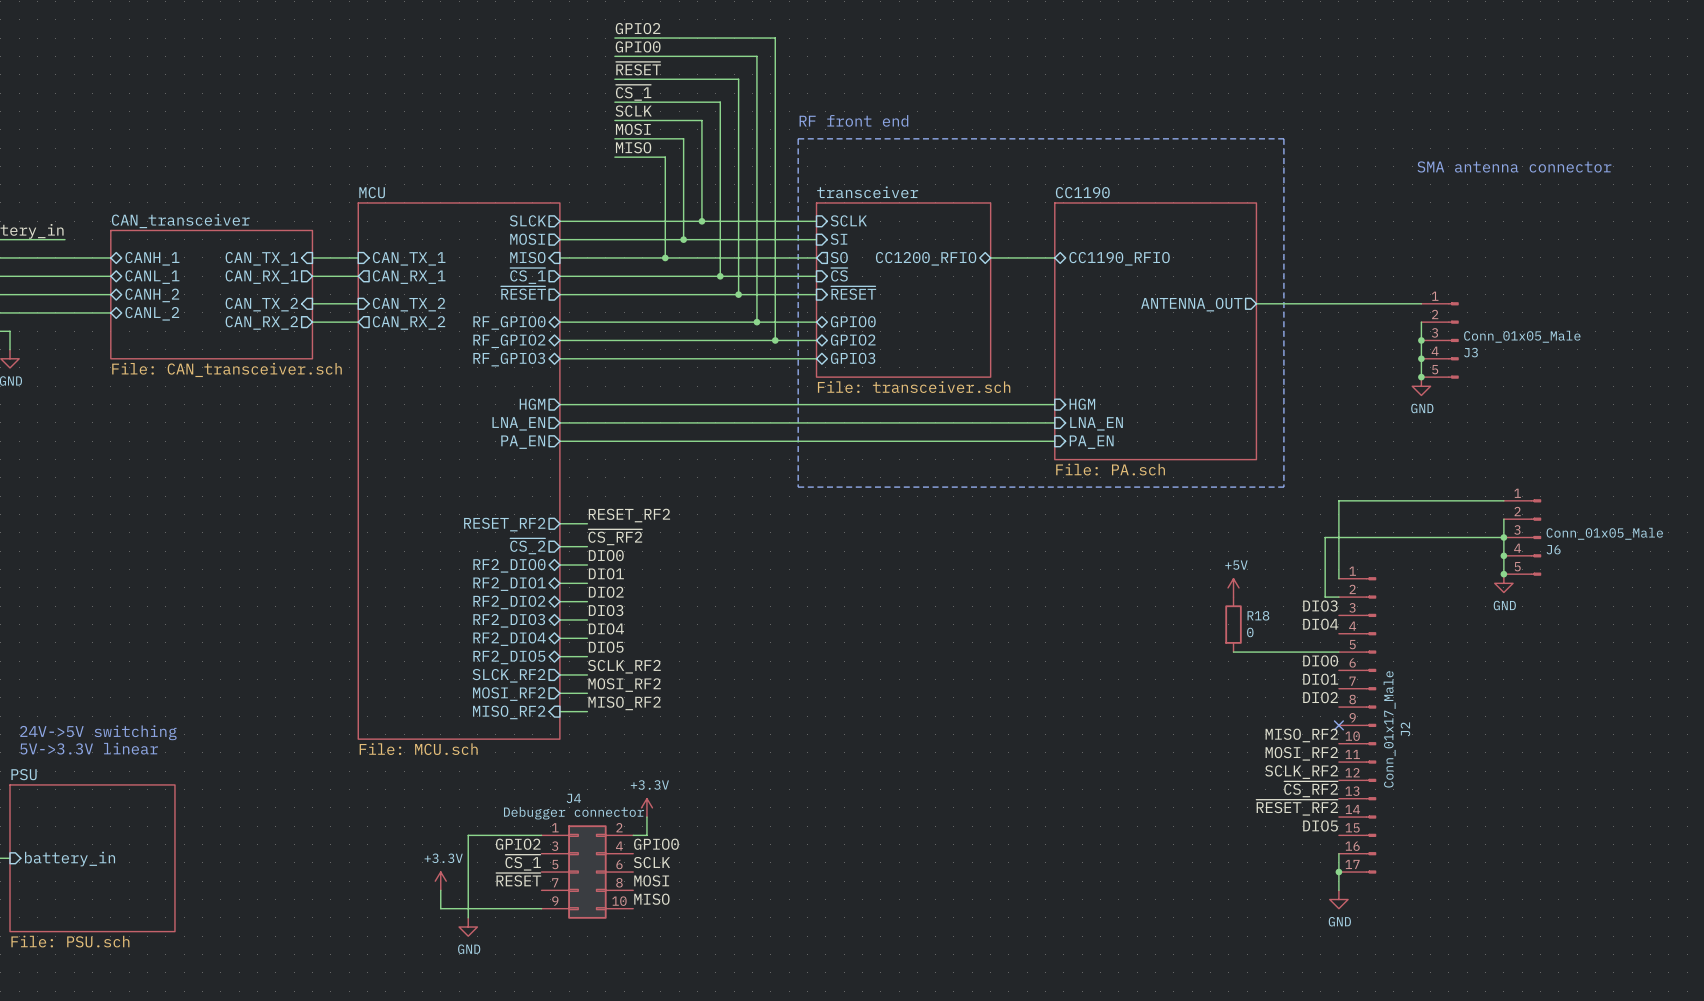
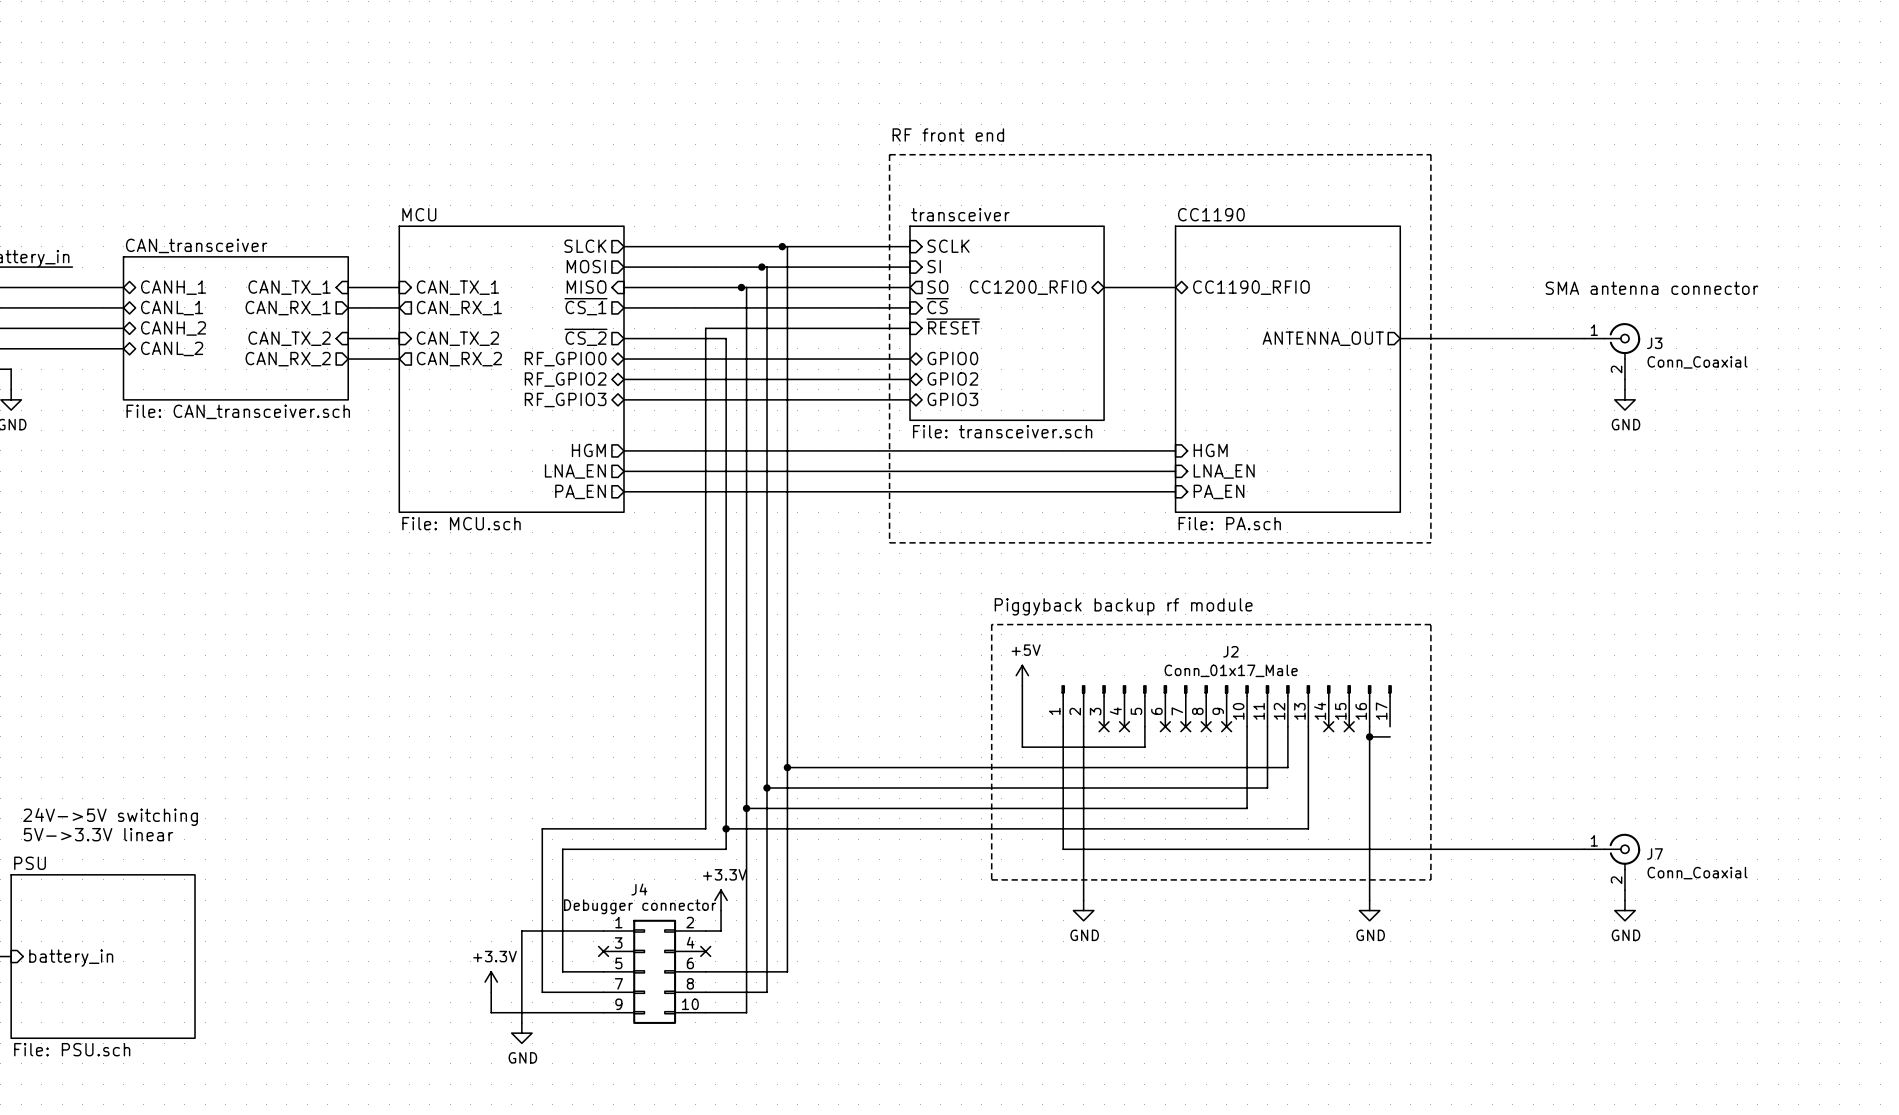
label: GPIO2 (638, 28) -> none
wire: (614, 38) (775, 38) (775, 340) -> none
label: GPIO0 (638, 46) -> none
wire: (614, 56) (756, 56) (756, 322) -> none
label: ~{RESET} (638, 68) -> none
wire: (614, 79) (738, 79) (738, 294) -> none
label: ~{CS_1} (633, 92) -> none
wire: (614, 102) (720, 102) (720, 276) -> none
label: SCLK (633, 111) -> none
wire: (614, 120) (701, 120) (701, 221) -> none
label: MOSI (633, 129) -> none
wire: (614, 138) (683, 138) (683, 239) -> none
label: MISO (633, 147) -> none
wire: (614, 157) (665, 157) (665, 257) -> none
text position: SMA antenna connector (1514, 166) -> SMA antenna connector (1651, 288)
wire: none -> (787, 246) (787, 971) (705, 971)
wire: none -> (766, 267) (766, 992) (705, 992)
wire: none -> (746, 287) (746, 1012) (705, 1012)
junction: (720, 276) -> none
sheet pin: ~{RESET} (523, 293) -> none
wire: (559, 294) (633, 294) -> (603, 992) (542, 992) (542, 828) (705, 828) (705, 328)
junction: (738, 294) -> none
J3 symbol: [1421, 302, 1459, 379] -> [1584, 323, 1641, 380]
sheet pin: none -> ~{CS_2} (586, 337)
wire: none -> (624, 338) (726, 338) (726, 849) (562, 849) (562, 971) (603, 971)
junction: (756, 322) -> none
wire: (1421, 322) (1421, 377) -> none
sheet MCU: none -> File: MCU.sch (511, 369)
J3 value: Conn_01x05_Male (1522, 336) -> Conn_Coaxial (1697, 362)
junction: (775, 340) -> none
junction: (1421, 340) -> none
wire: none -> (1624, 379) (1624, 389)
J3 name position: J3 (1471, 352) -> J3 (1654, 343)
junction: (1421, 358) -> none
junction: (1421, 377) -> none
power symbol position: GND (1421, 386) -> GND (1624, 399)
sheet MCU: File: MCU.sch (459, 471) -> none
wire: (1503, 500) (1338, 500) (1338, 578) -> none
label: RESET_RF2 (629, 515) -> none
wire: (1503, 519) (1503, 574) -> none
wire: (559, 523) (587, 523) -> none
sheet pin: RESET_RF2 (504, 524) -> none
label: ~{CS_RF2} (615, 537) -> none
wire: (1503, 537) (1325, 537) (1325, 597) (1338, 597) -> none
junction: (1503, 537) -> none
J6: Conn_01x05_Male (1522, 537) -> none
text: none -> Piggyback backup rf module (1123, 606)
sheet pin: ~{CS_2} (527, 546) -> none
wire: (559, 546) (587, 546) -> none
label: DIO0 (606, 555) -> none
junction: (1503, 555) -> none
line: none -> (991, 624) (1430, 624) (1430, 879) (991, 879) (991, 624)
sheet pin: RF2_DIO0 (509, 565) -> none
wire: (559, 565) (587, 565) -> none
label: DIO1 (606, 573) -> none
junction: (1503, 574) -> none
wire: (559, 583) (587, 583) -> none
power symbol: GND (1503, 583) -> none
sheet pin: RF2_DIO1 (509, 584) -> none
power symbol: +5V (1233, 587) -> none
label: DIO2 (606, 592) -> none
wire: (559, 601) (587, 601) -> none
sheet pin: RF2_DIO2 (509, 602) -> none
label: DIO3 (1320, 605) -> none
power symbol: none -> +5V (1022, 675)
label: DIO3 (606, 610) -> none
wire: none -> (1022, 685) (1022, 747) (1144, 747) (1144, 726)
wire: (559, 619) (587, 619) -> none
sheet pin: RF2_DIO3 (509, 620) -> none
R18: 0 (1233, 624) -> none
label: DIO4 (1320, 624) -> none
label: DIO4 (606, 628) -> none
wire: (559, 638) (587, 638) -> none
sheet pin: RF2_DIO4 (509, 639) -> none
label: DIO5 (606, 647) -> none
wire: none -> (1063, 726) (1063, 849) (1584, 849)
wire: none -> (1083, 726) (1083, 900)
no-connect mark: none -> (1104, 726)
no-connect mark: none -> (1124, 726)
no-connect mark: none -> (1165, 726)
no-connect mark: none -> (1185, 726)
no-connect mark: none -> (1206, 726)
no-connect mark: none -> (1226, 726)
wire: none -> (1247, 726) (1247, 808) (746, 808)
wire: none -> (1267, 726) (1267, 788) (766, 788)
wire: none -> (1287, 726) (1287, 767) (787, 767)
wire: none -> (1308, 726) (1308, 828) (726, 828)
no-connect mark: none -> (1328, 726)
no-connect mark: none -> (1349, 726)
wire: none -> (1369, 726) (1369, 900)
wire: (1233, 652) (1338, 652) -> none
wire: (559, 656) (587, 656) -> none
sheet pin: RF2_DIO5 (509, 657) -> none
label: DIO0 (1320, 660) -> none
wire: none -> (1369, 736) (1390, 736)
junction: none -> (1369, 736)
label: SCLK_RF2 (624, 666) -> none
wire: (559, 674) (587, 674) -> none
sheet pin: SLCK_RF2 (509, 675) -> none
label: DIO1 (1320, 679) -> none
label: MOSI_RF2 (624, 685) -> none
junction: none -> (787, 767)
wire: (559, 693) (587, 693) -> none
sheet pin: MOSI_RF2 (509, 694) -> none
label: DIO2 (1320, 697) -> none
label: MISO_RF2 (624, 703) -> none
junction: none -> (766, 788)
wire: (559, 711) (587, 711) -> none
sheet pin: MISO_RF2 (509, 712) -> none
junction: none -> (746, 808)
no-connect mark: (1338, 725) -> none
J2 position: (1357, 725) -> (1226, 705)
J2 rotation: 0° (1370, 725) -> 90° counterclockwise (1226, 690)
label: MISO_RF2 (1301, 735) -> none
junction: none -> (726, 828)
label: MOSI_RF2 (1301, 753) -> none
label: SCLK_RF2 (1301, 772) -> none
J7: none -> Conn_Coaxial (1612, 861)
label: ~{CS_RF2} (1311, 789) -> none
wire: none -> (1624, 890) (1624, 900)
label: ~{RESET_RF2} (1297, 807) -> none
power symbol: none -> GND (1083, 910)
power symbol: none -> GND (1369, 910)
power symbol: none -> GND (1624, 910)
label: DIO5 (1320, 825) -> none
label: GPIO2 (518, 844) -> none
label: GPIO0 (656, 844) -> none
no-connect mark: none -> (603, 951)
no-connect mark: none -> (705, 951)
wire: (1338, 853) (1338, 890) -> none
label: ~{CS_1} (523, 862) -> none
label: SCLK (651, 862) -> none
junction: (1338, 872) -> none
label: ~{RESET} (518, 879) -> none
label: MOSI (651, 880) -> none
label: MISO (651, 899) -> none
power symbol: GND (1338, 899) -> none

